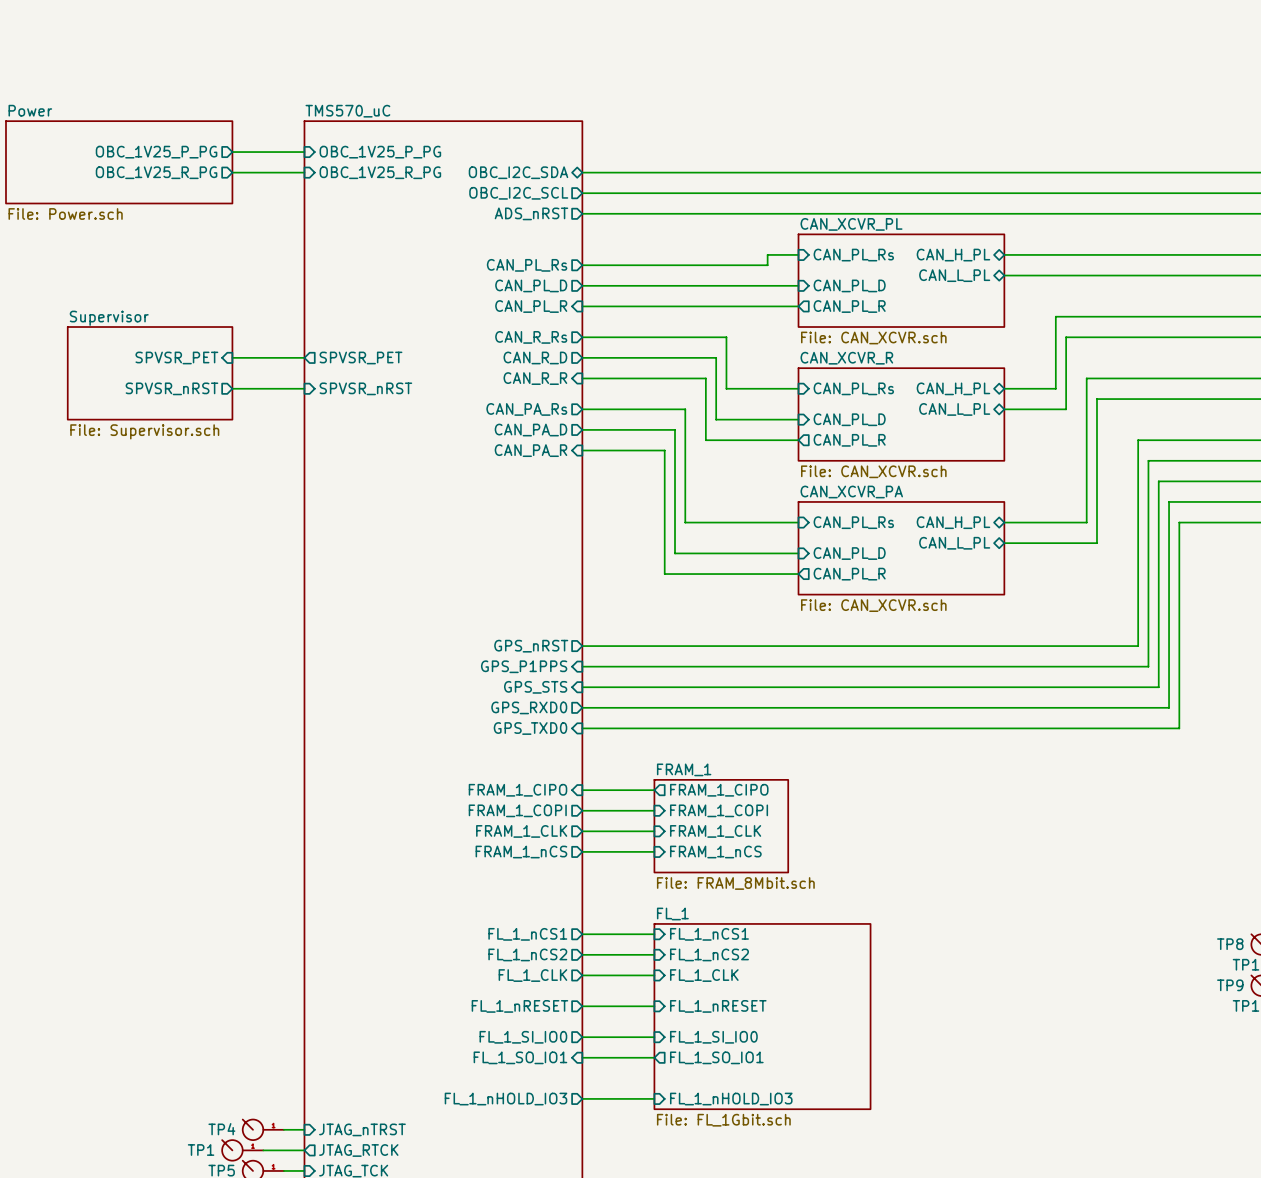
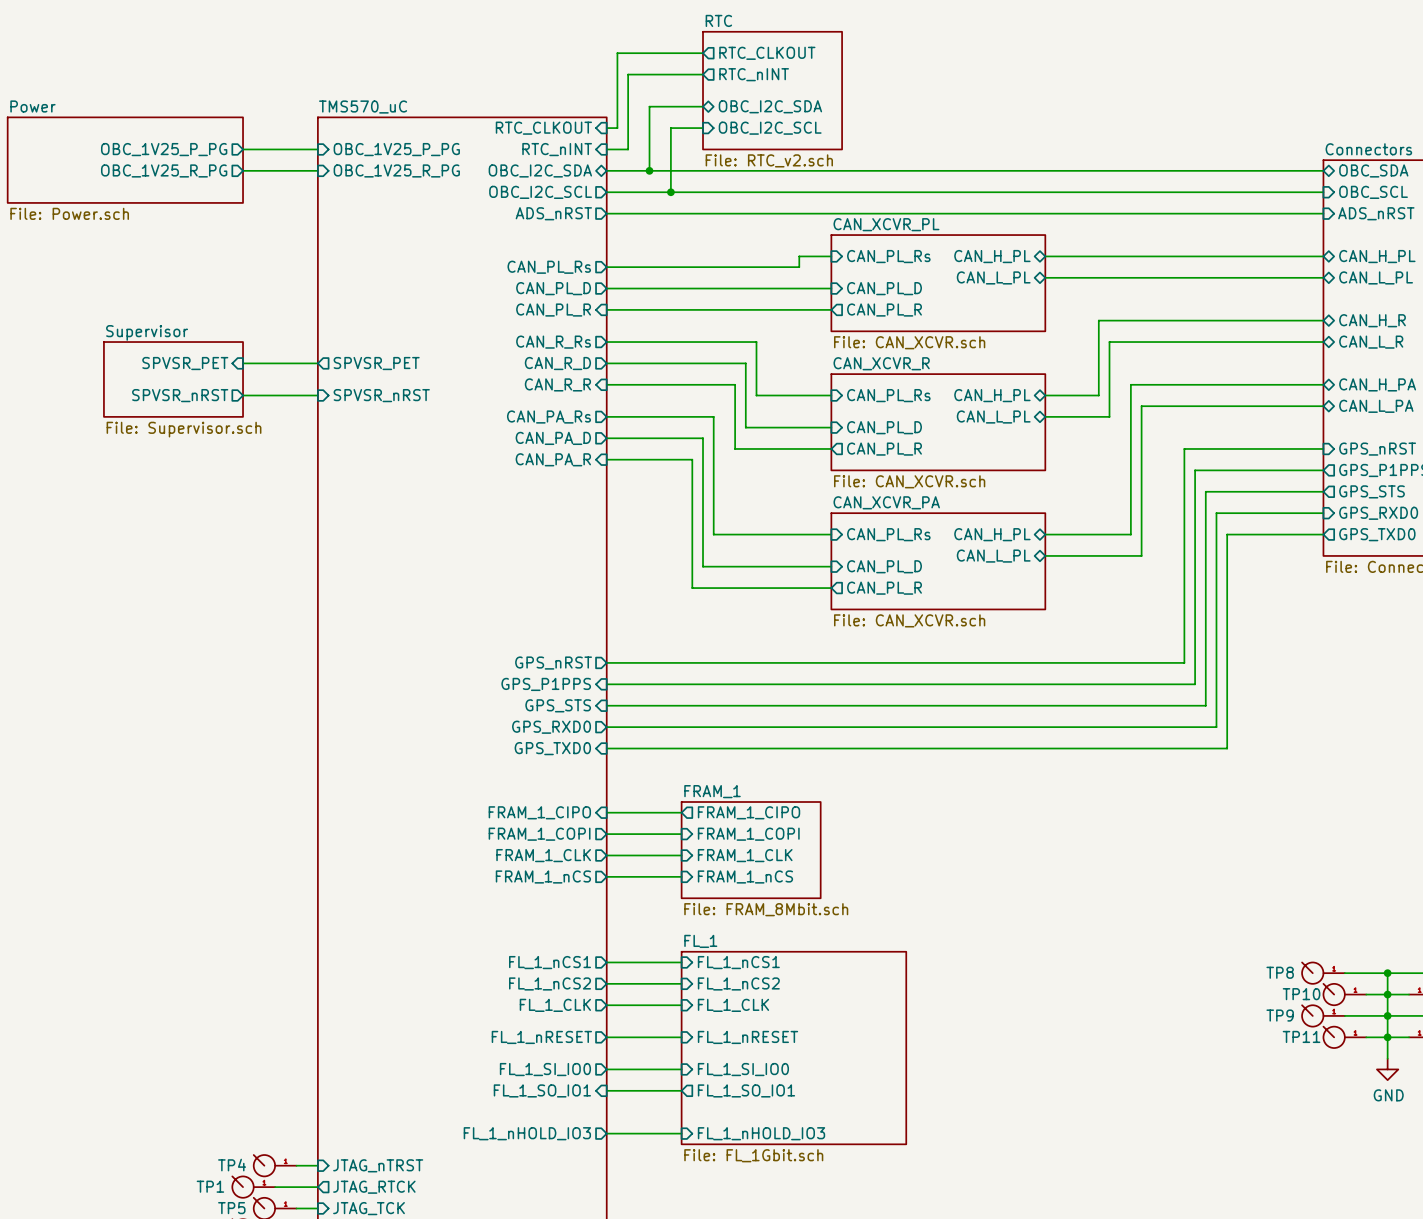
wire: none -> (703, 53) (617, 53) (617, 128) (606, 128)
sheet pin: none -> RTC_CLKOUT (767, 53)
wire: none -> (703, 74) (628, 74) (628, 149) (606, 149)
sheet pin: none -> RTC_nINT (754, 74)
sheet RTC: none -> File: RTC_v2.sch (772, 90)
wire: none -> (703, 106) (649, 106) (649, 170)
sheet pin: none -> OBC_I2C_SDA (770, 106)
sheet pin: none -> RTC_CLKOUT (543, 128)
wire: none -> (703, 128) (670, 128) (670, 192)
sheet pin: none -> OBC_I2C_SCL (770, 128)
sheet pin: none -> RTC_nINT (557, 149)
junction: none -> (649, 170)
junction: none -> (670, 192)
sheet Supervisor: File: Supervisor.sch (150, 373) -> none
sheet Supervisor: none -> File: Supervisor.sch (173, 379)

